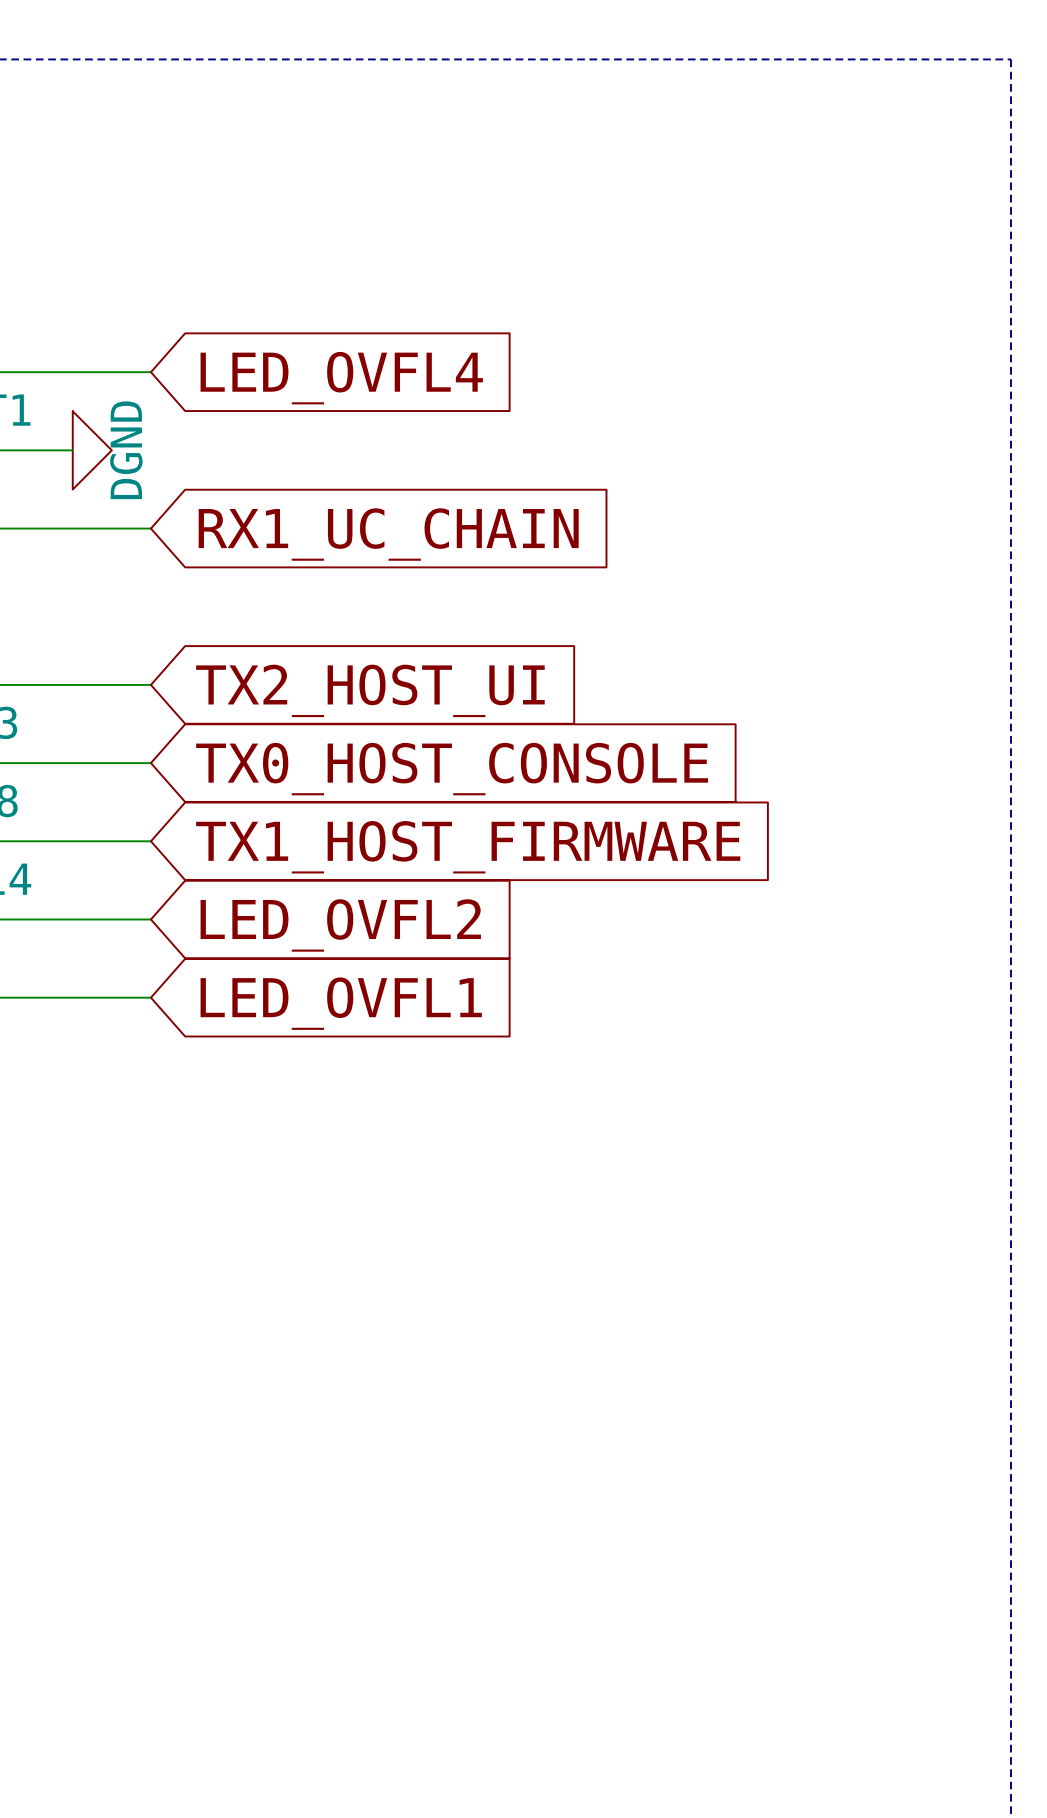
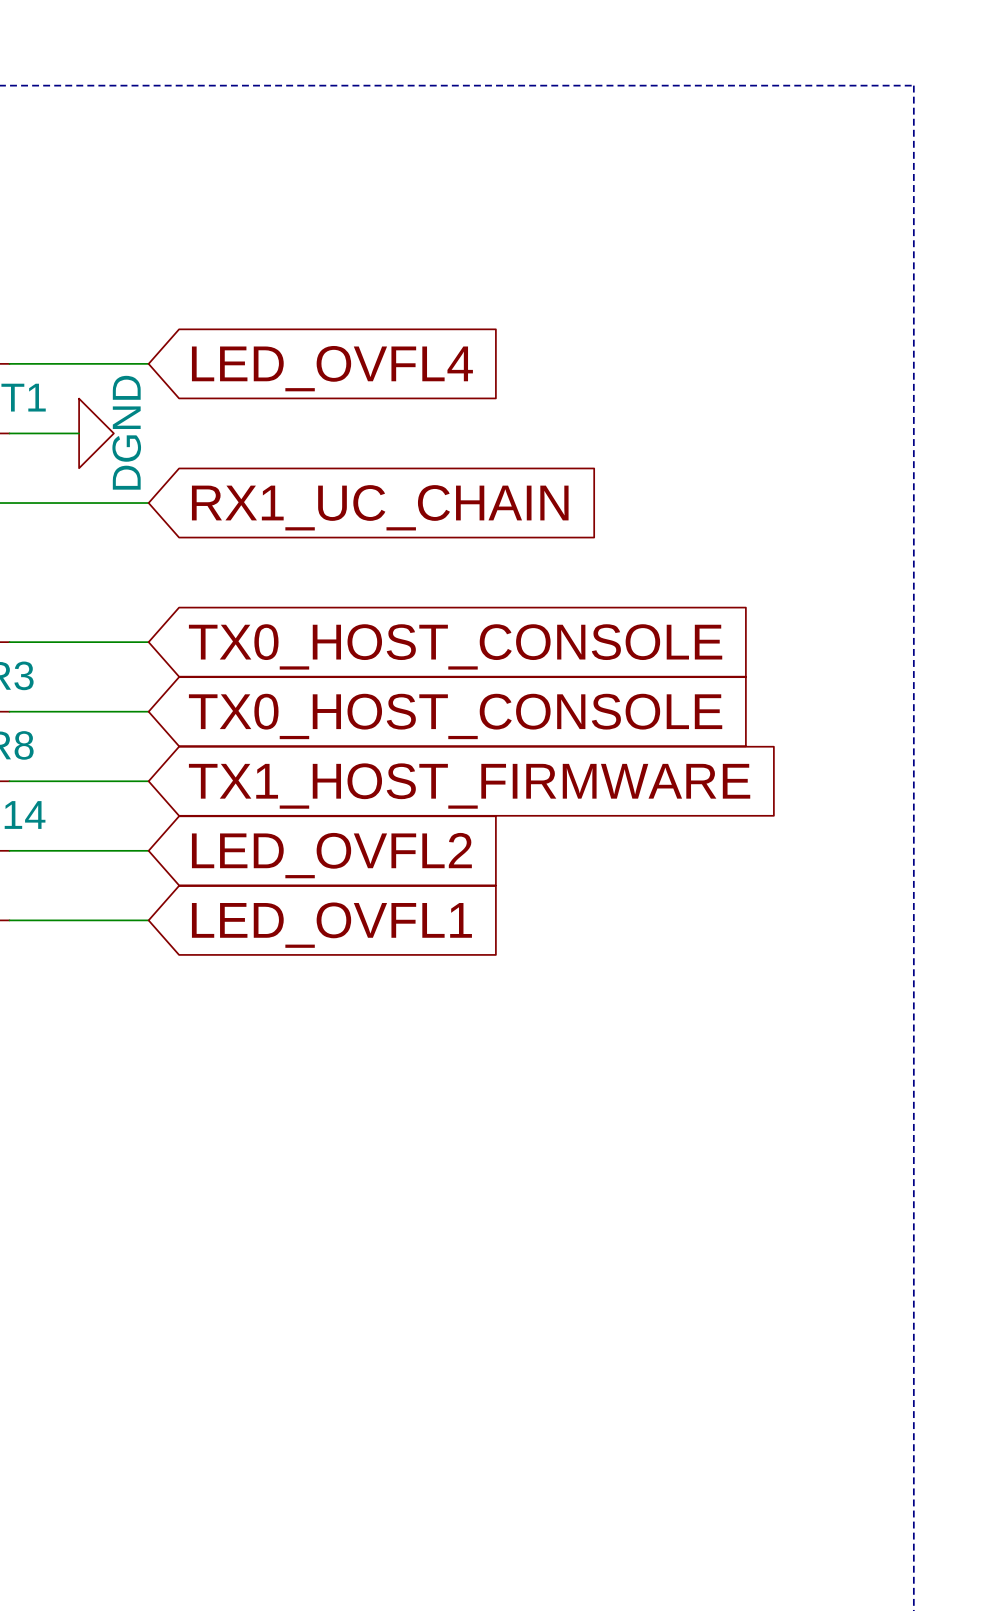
global label: TX2_HOST_UI (370, 690) -> TX0_HOST_CONSOLE (455, 646)

